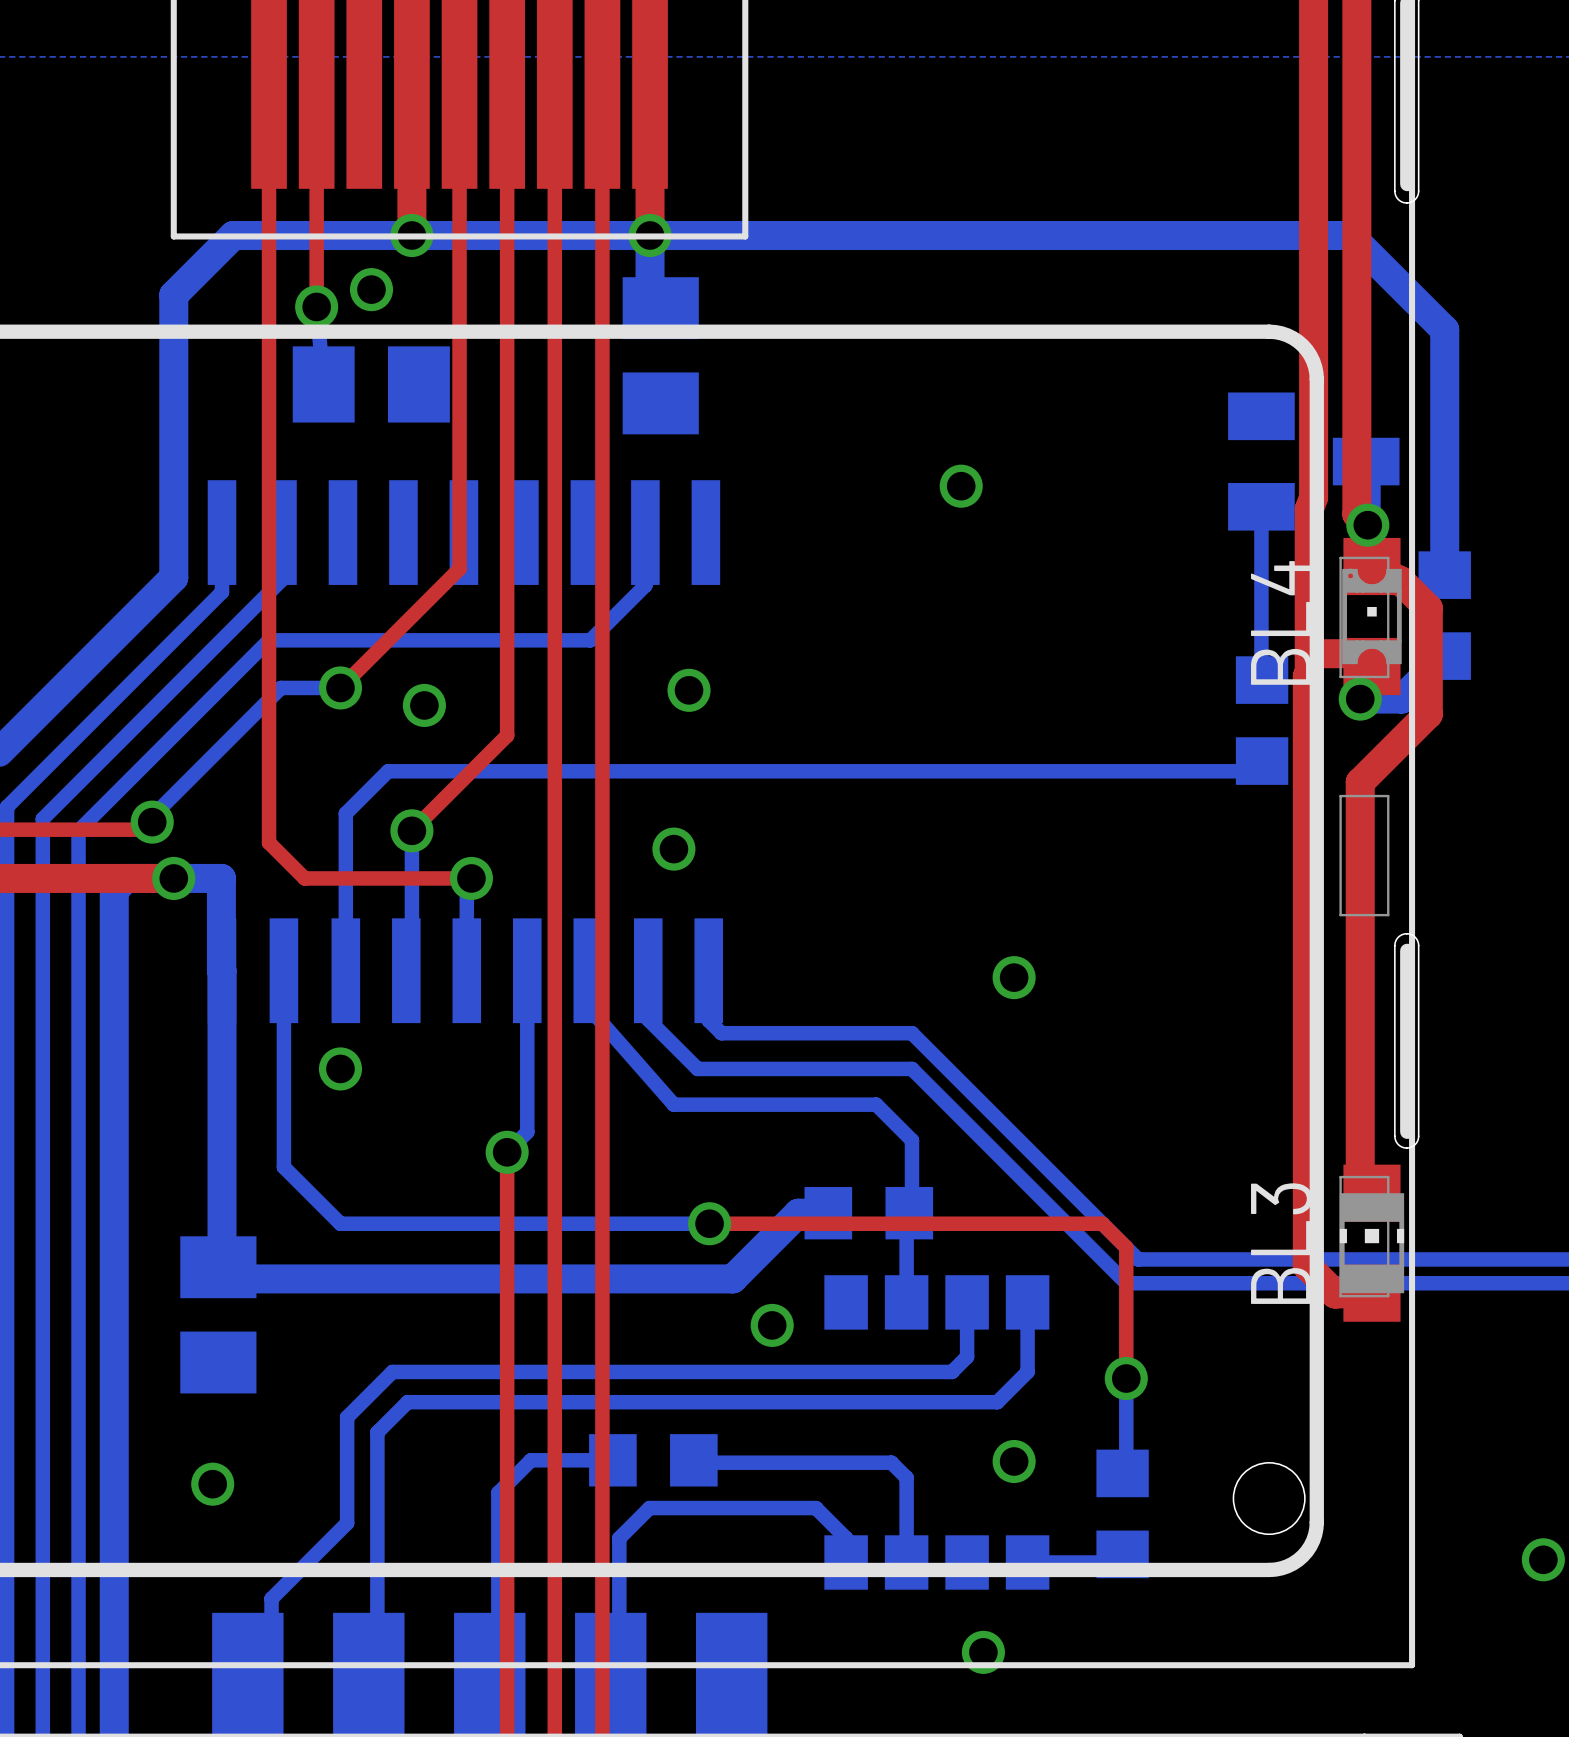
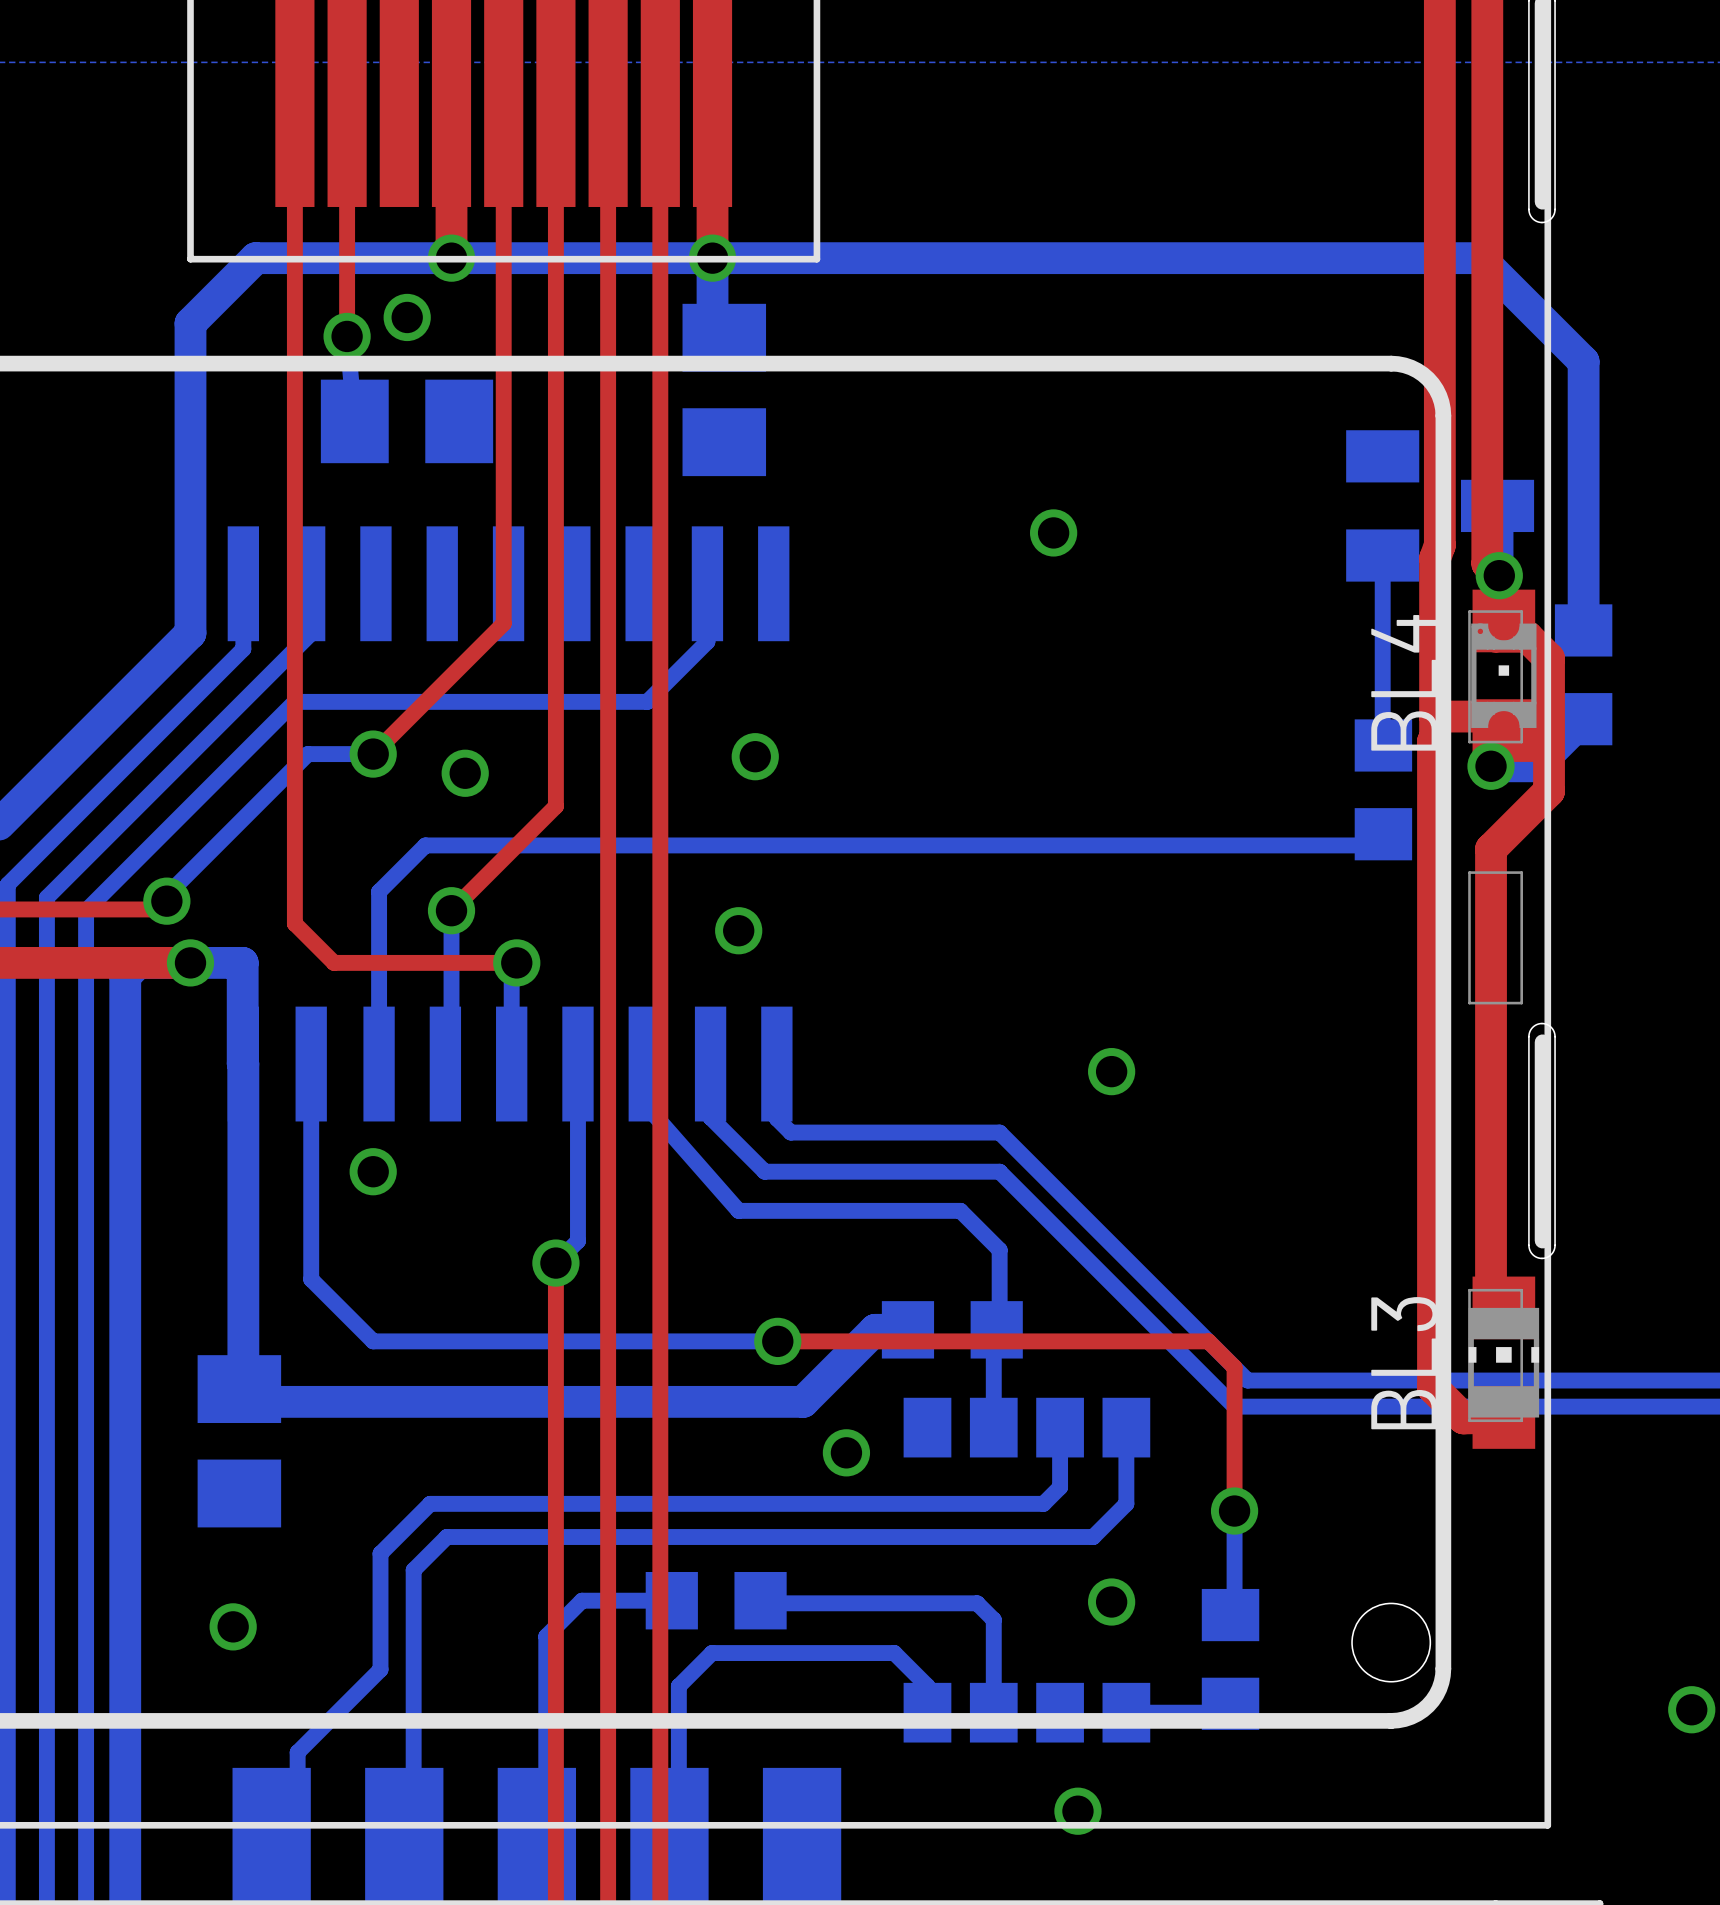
top track: (1367, 577) (1371, 566) (1400, 580) (1428, 608) (1428, 714) (1360, 782) -> (1499, 632) (1495, 636) (1527, 636) (1549, 658) (1549, 791) (1491, 849) (1491, 857)

